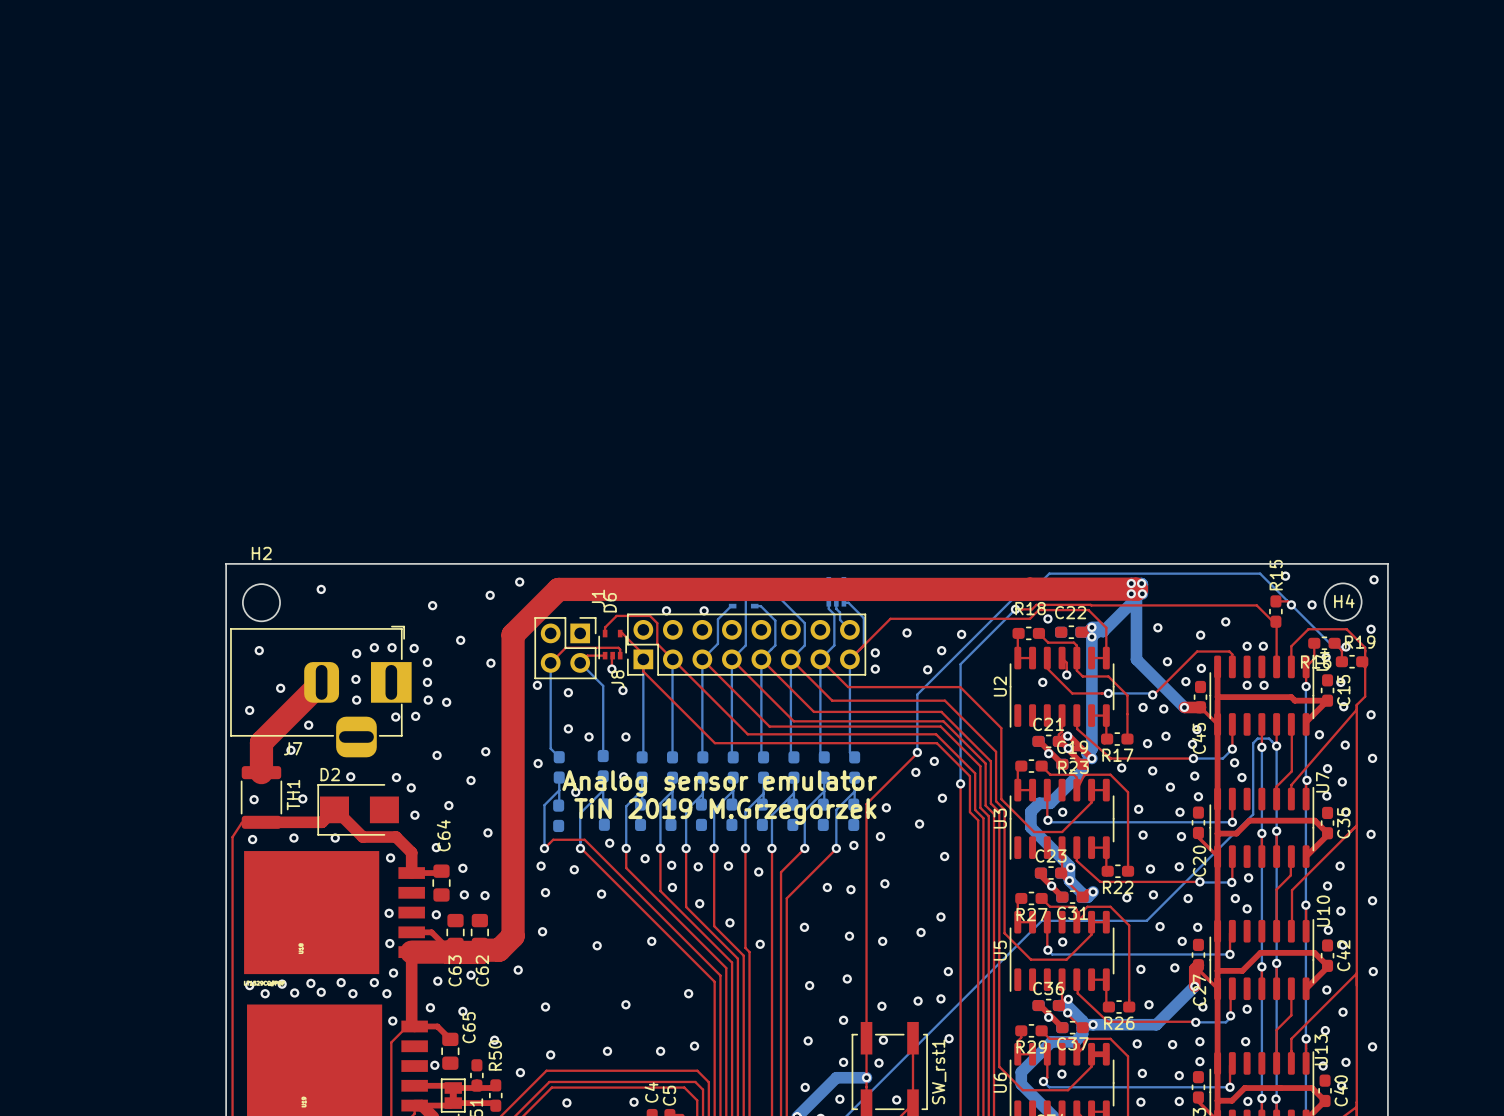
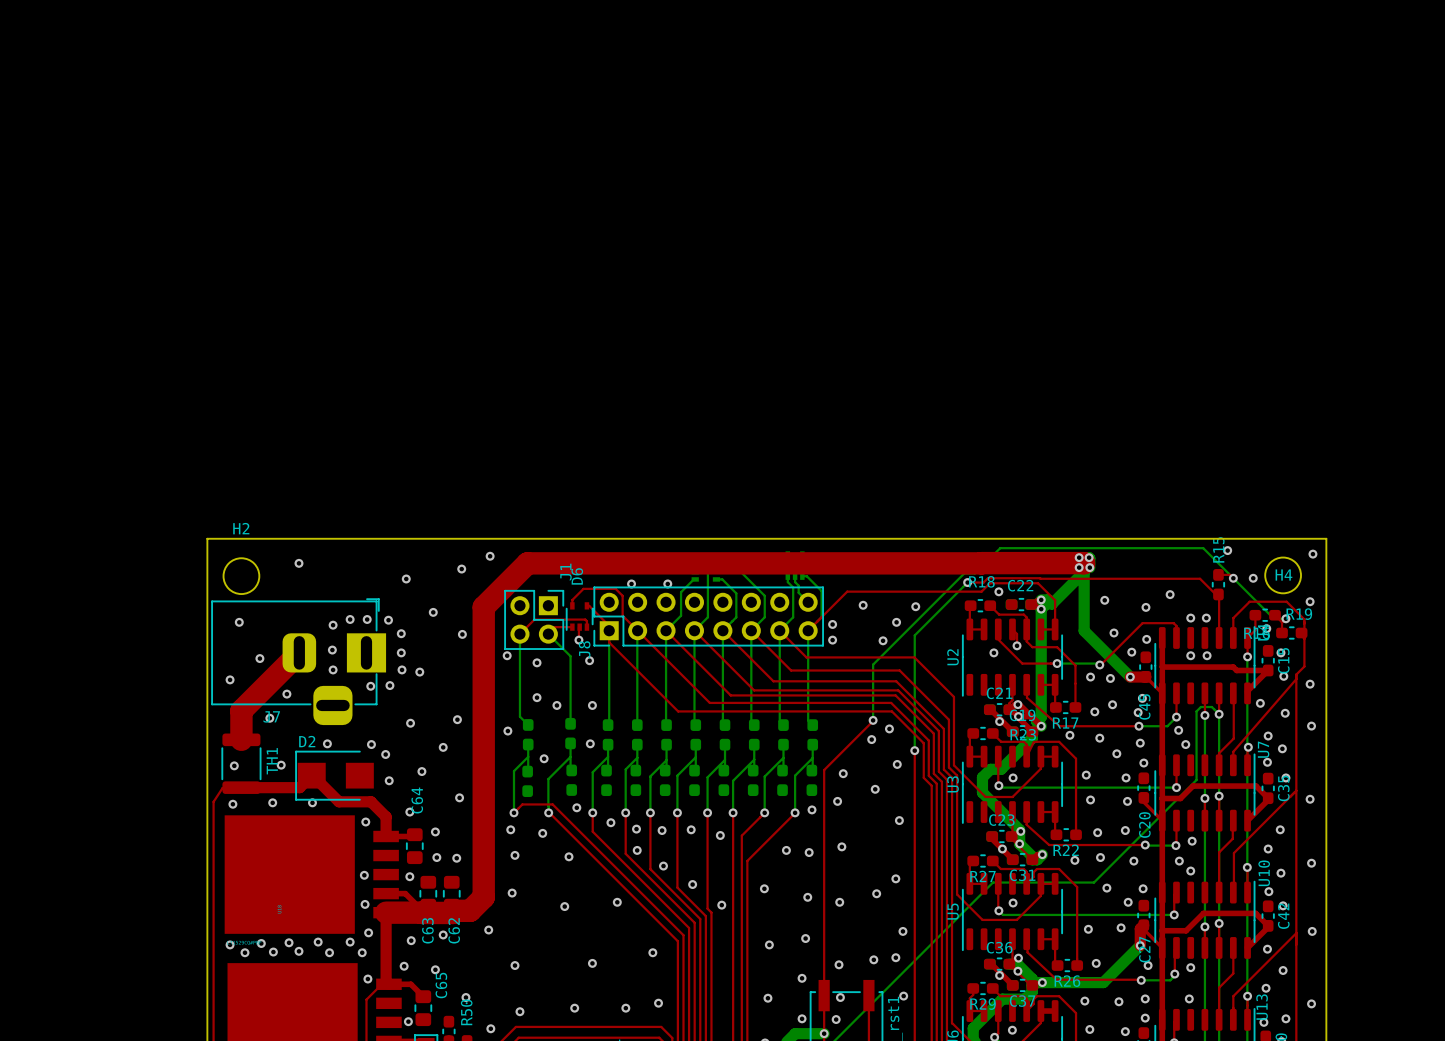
text: Analog sensor emulator (719, 783) -> none
text: TiN 2019 M.Grzegorzek (725, 811) -> none

